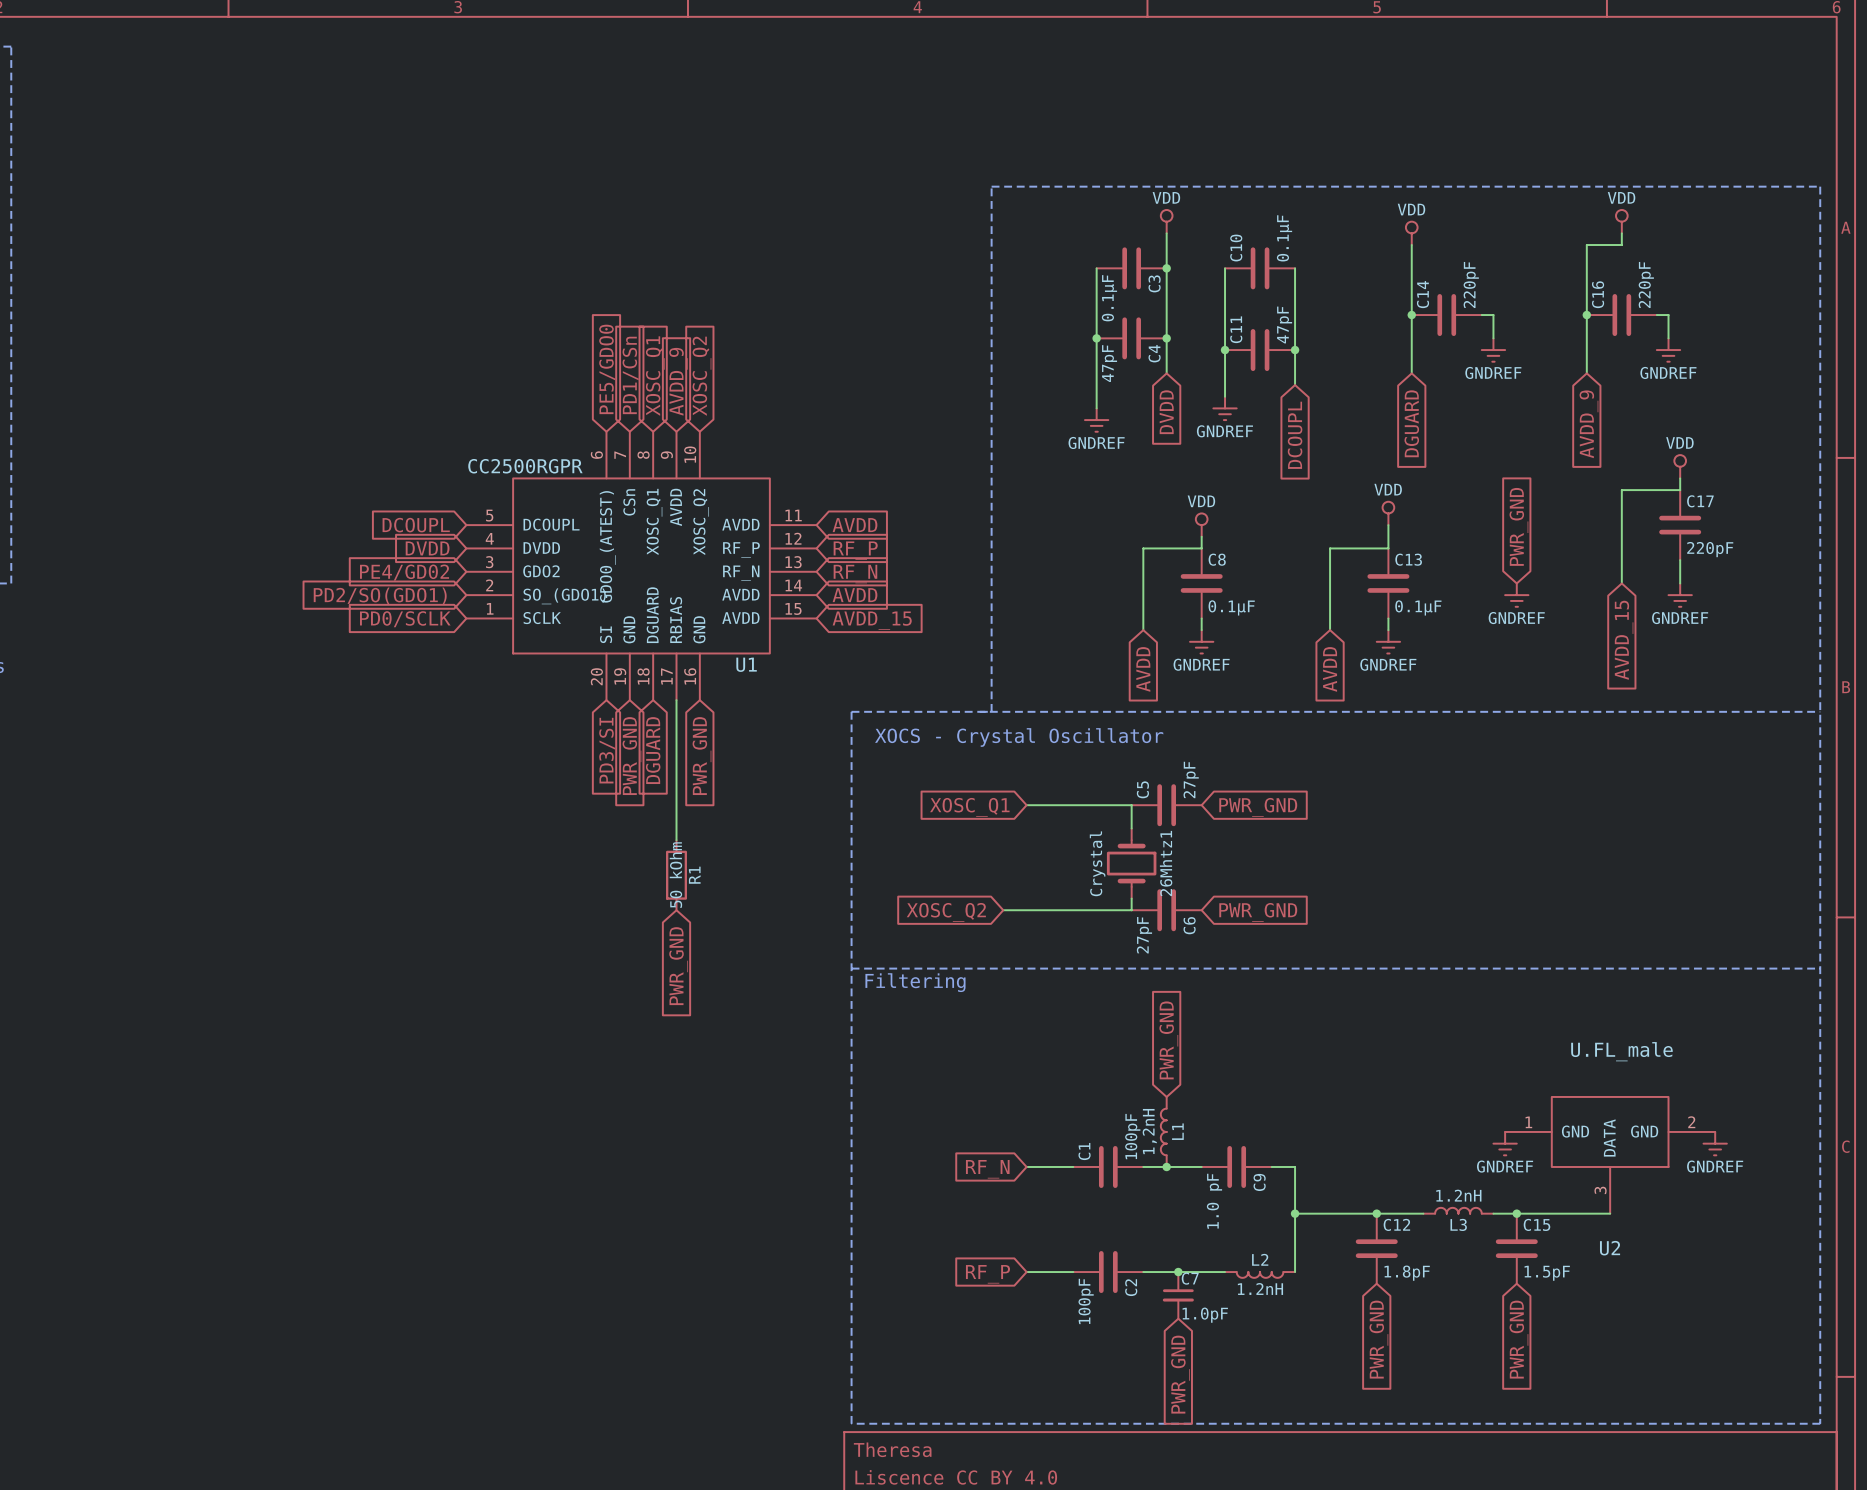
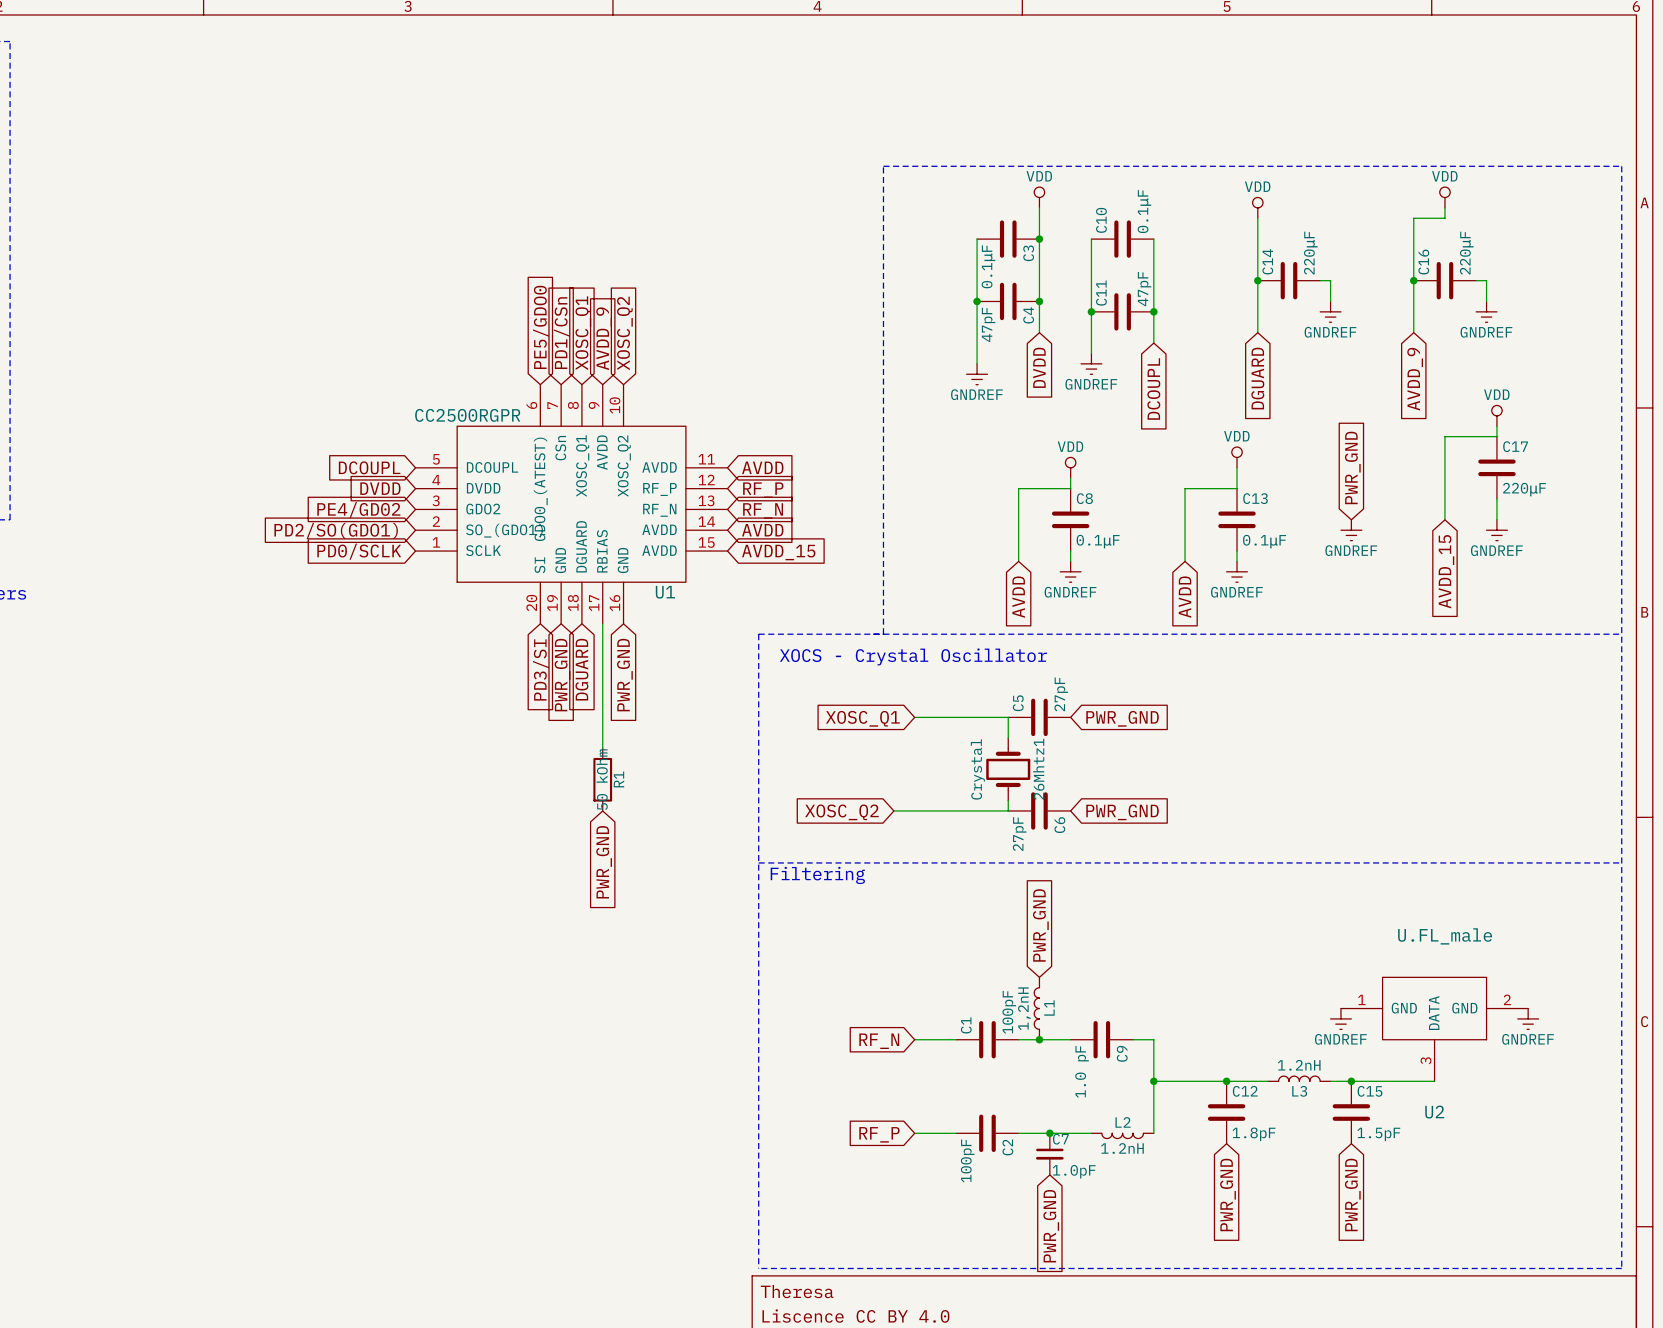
C14 value: 220pF (1471, 284) -> 220μF (1310, 253)
C16 value: 220pF (1646, 284) -> 220μF (1466, 253)
C17 value: 220pF (1710, 549) -> 220μF (1524, 489)

